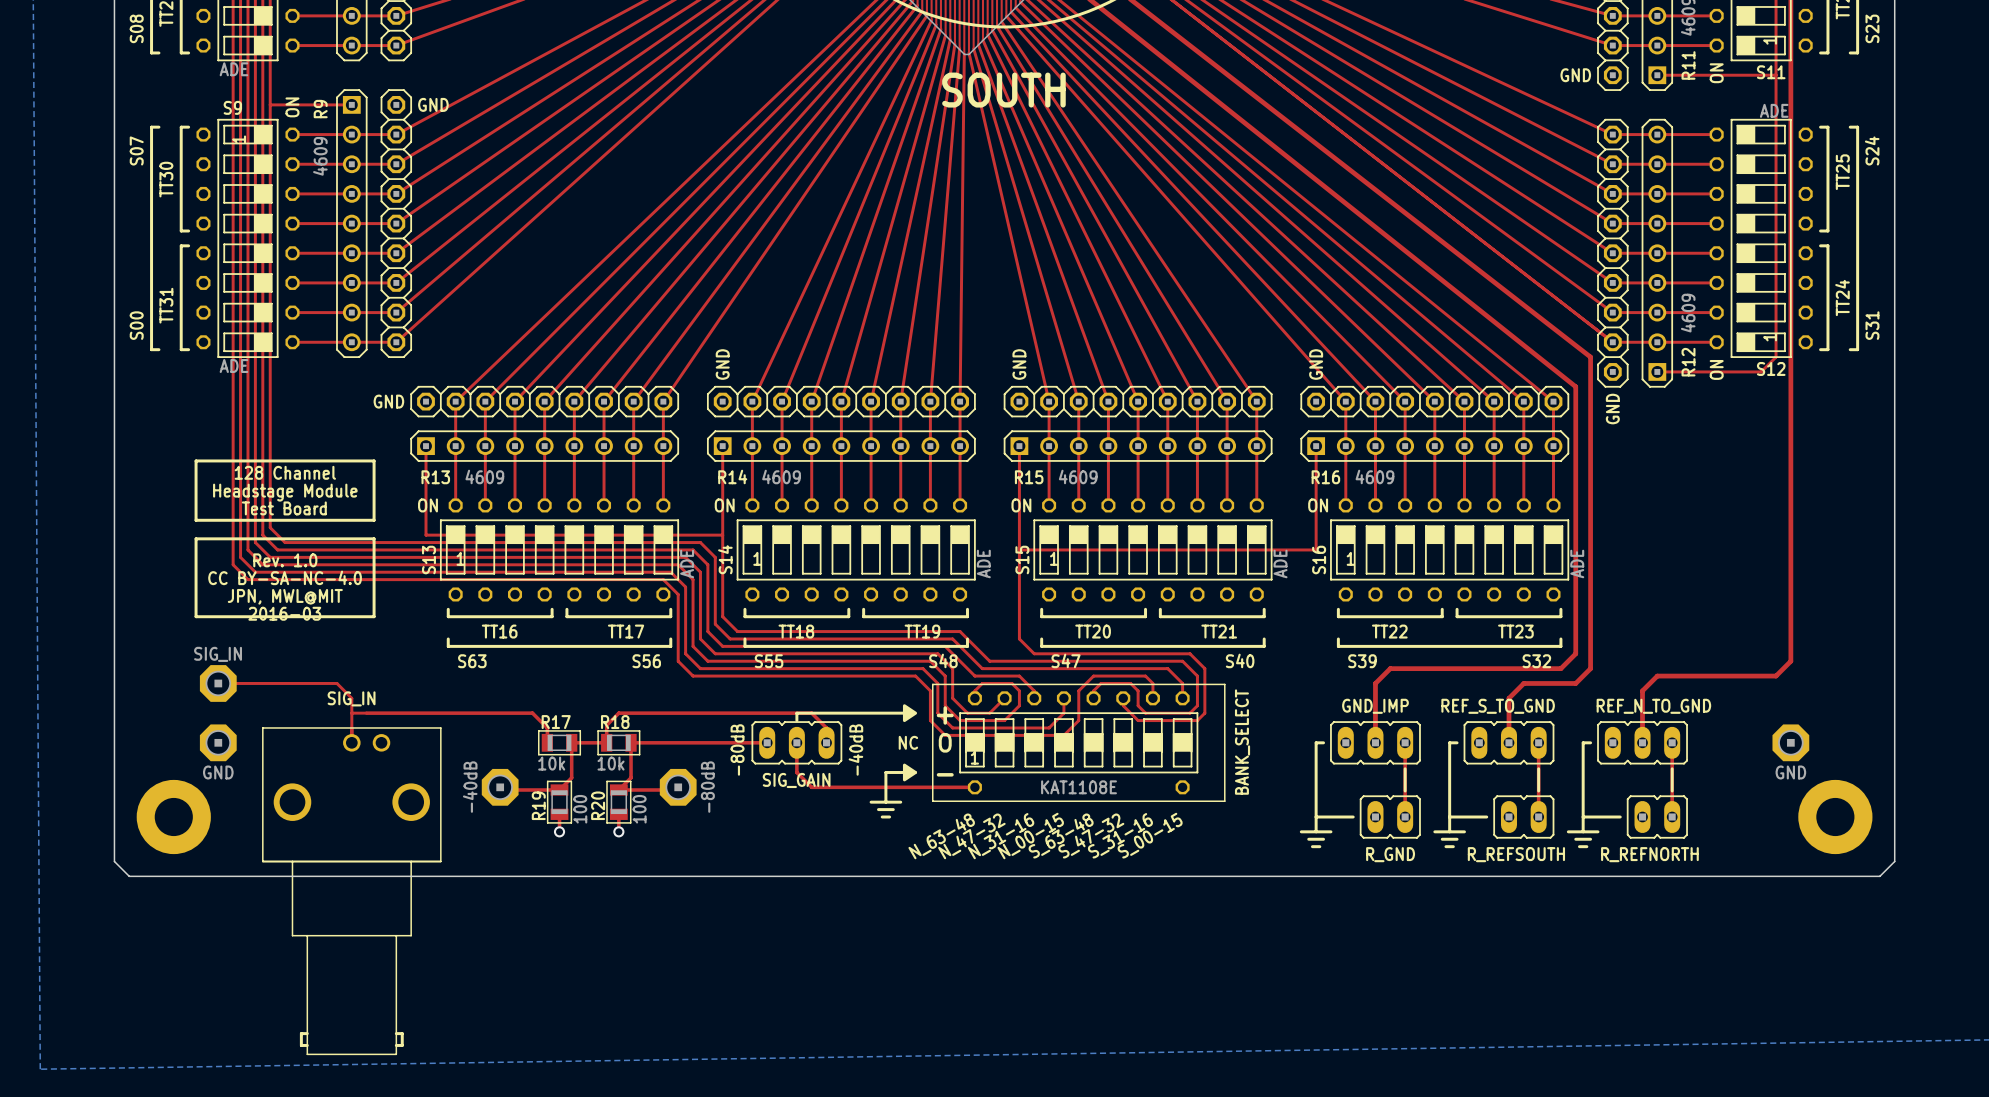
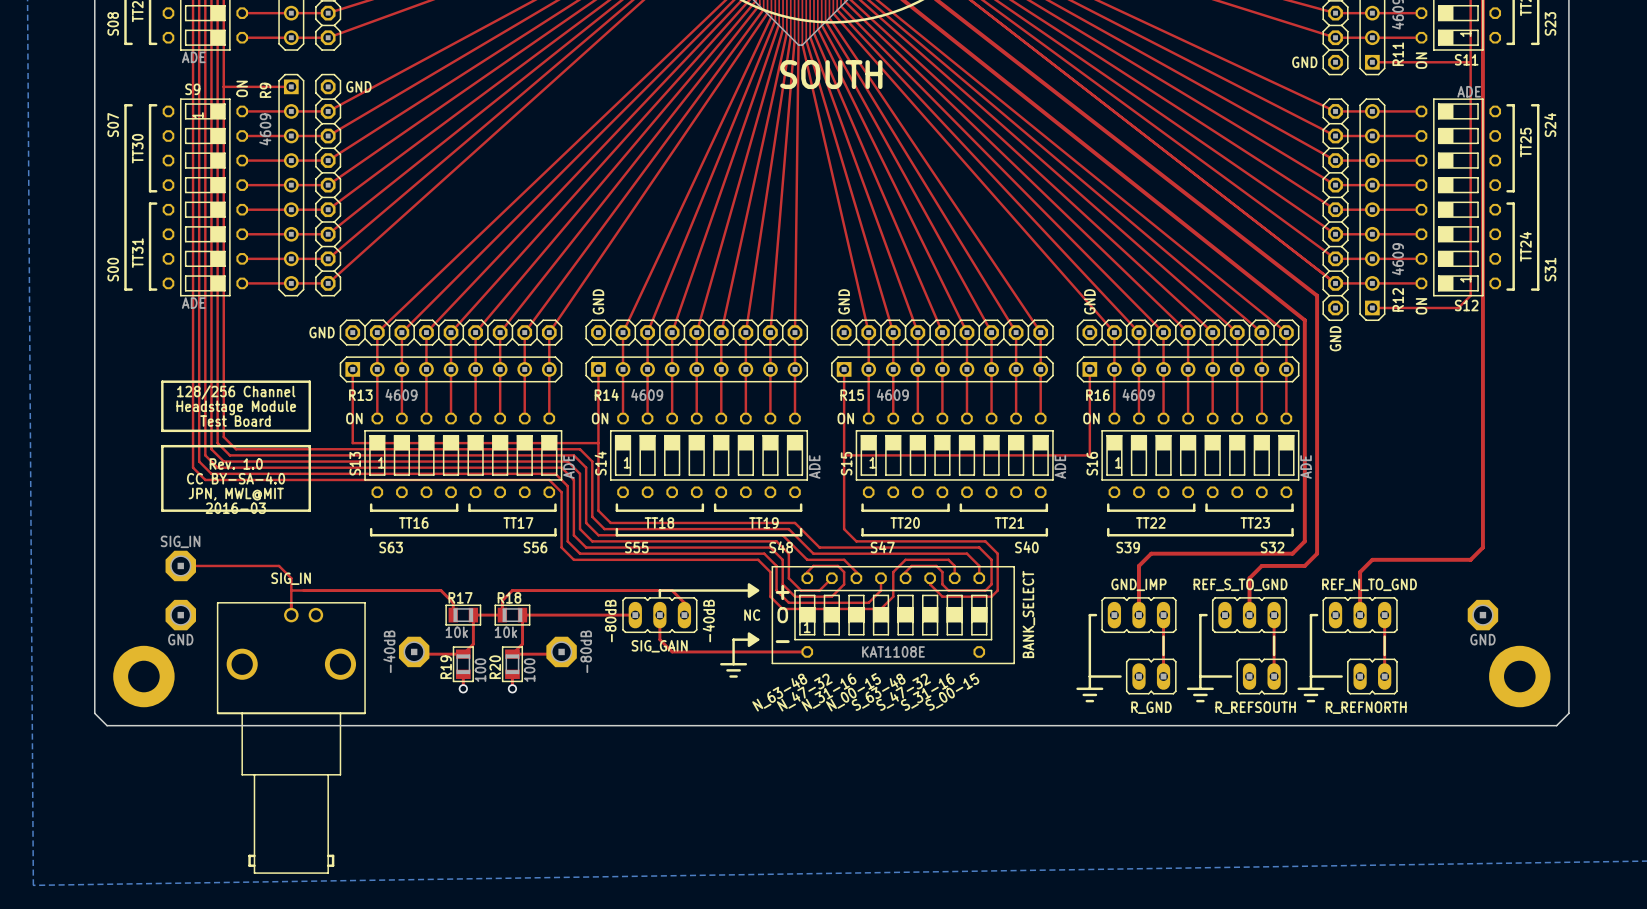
text: 128 Channel (285, 472) -> 128/256 Channel (236, 392)
text: CC BY-SA-NC-4.0 (285, 577) -> CC BY-SA-4.0 (236, 478)

